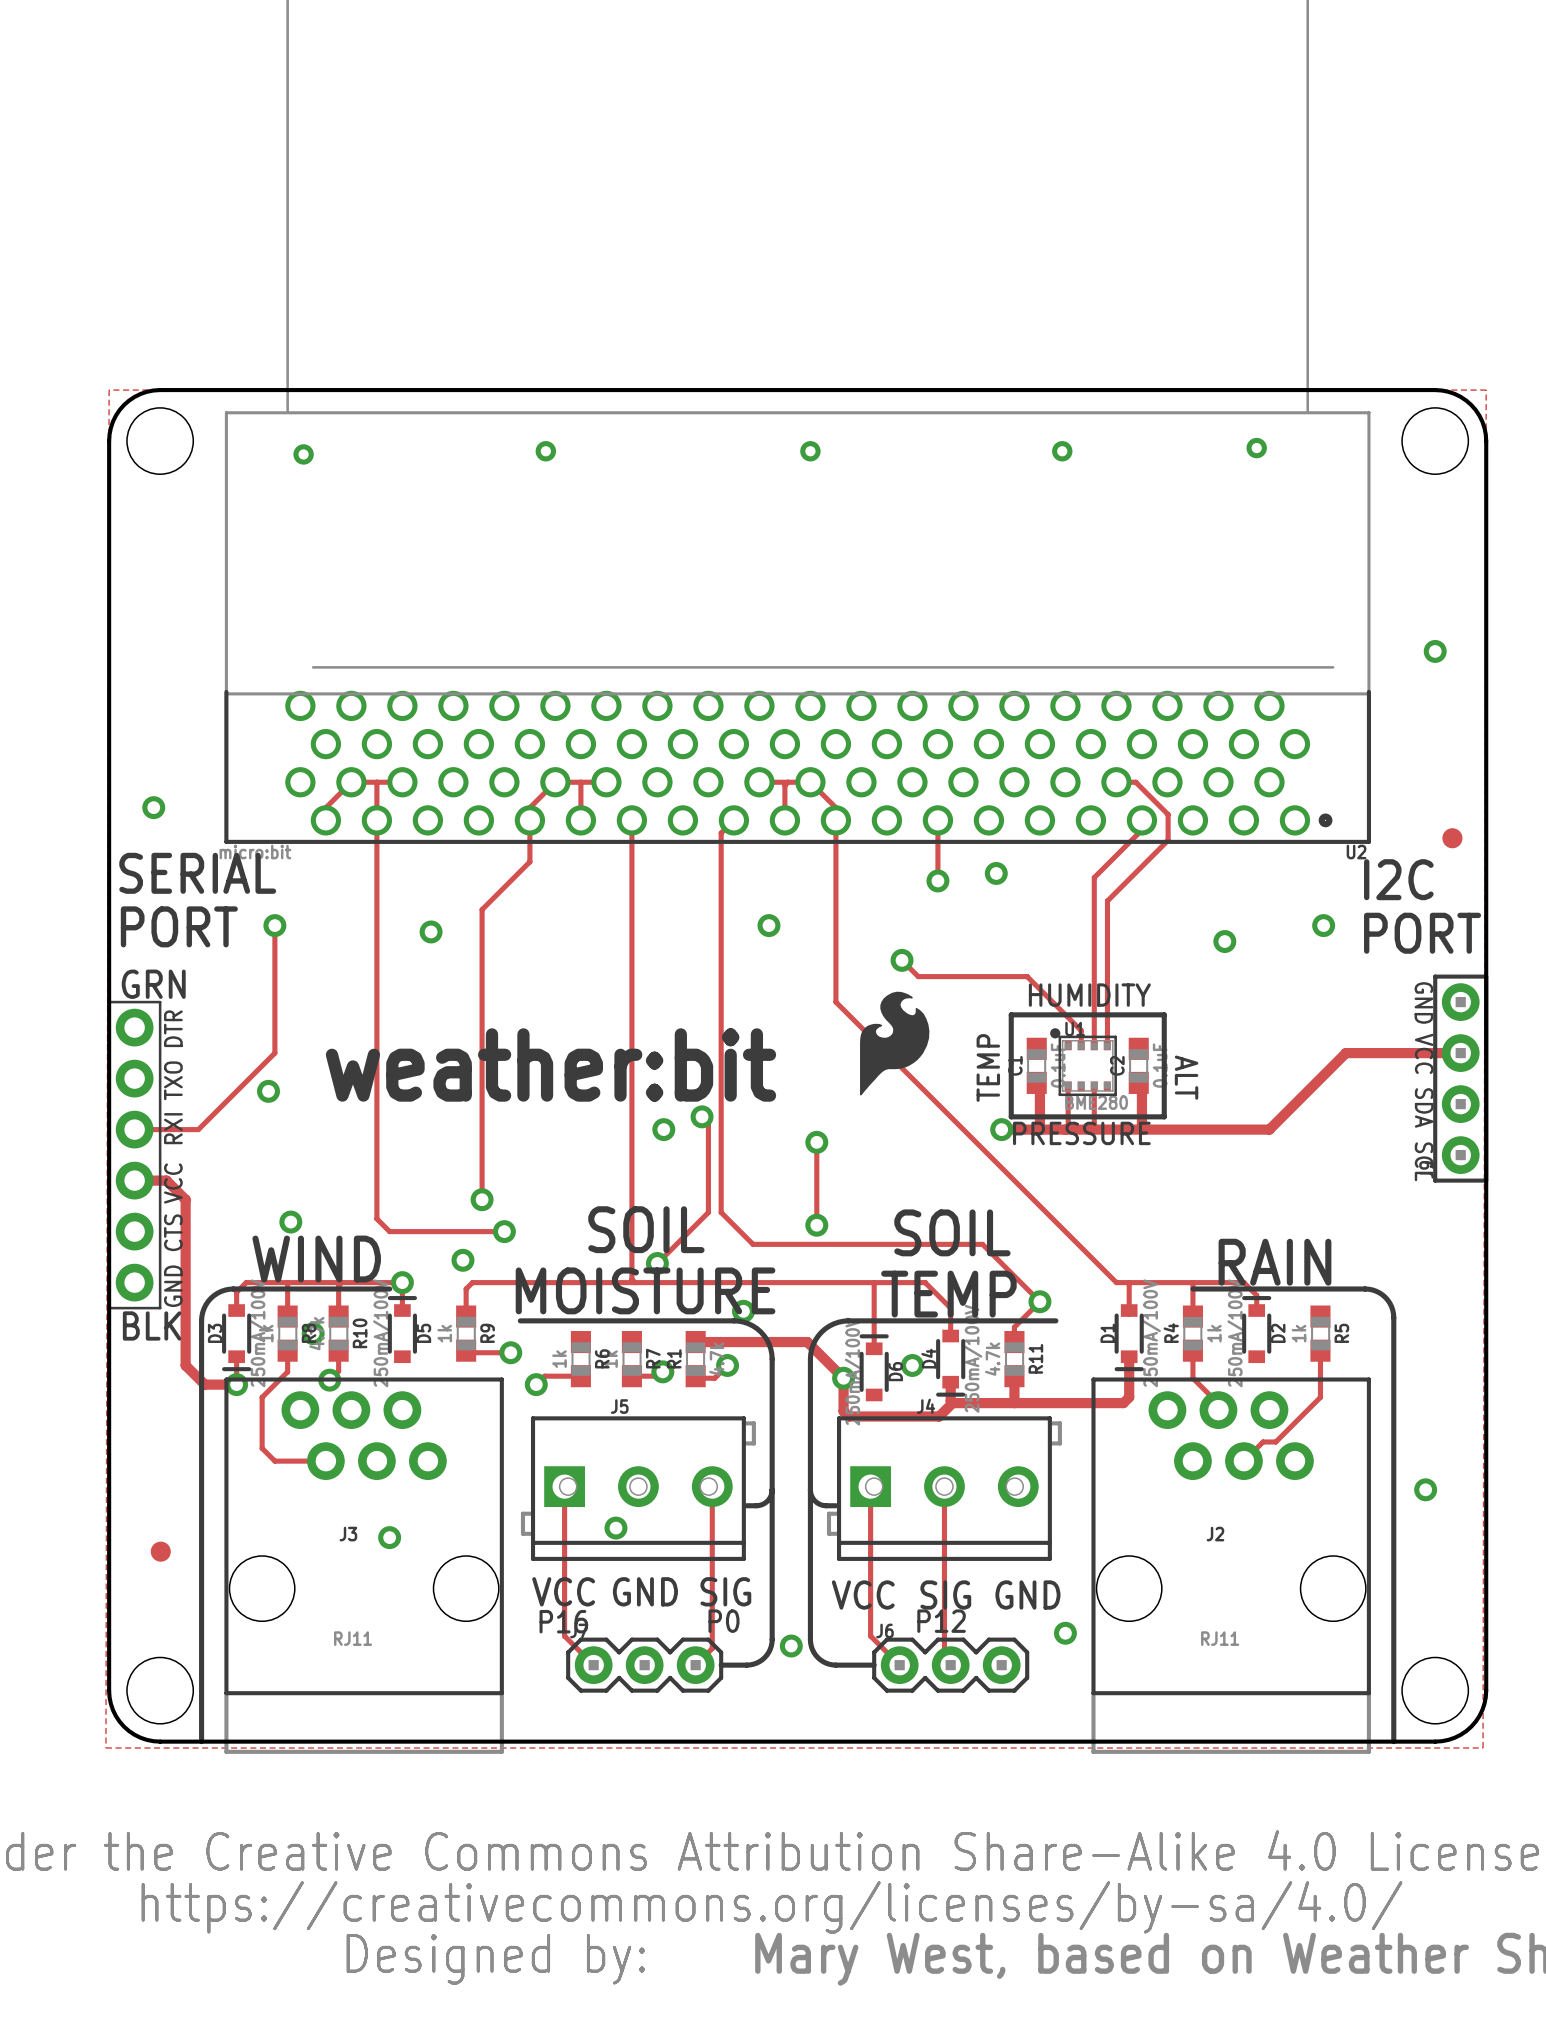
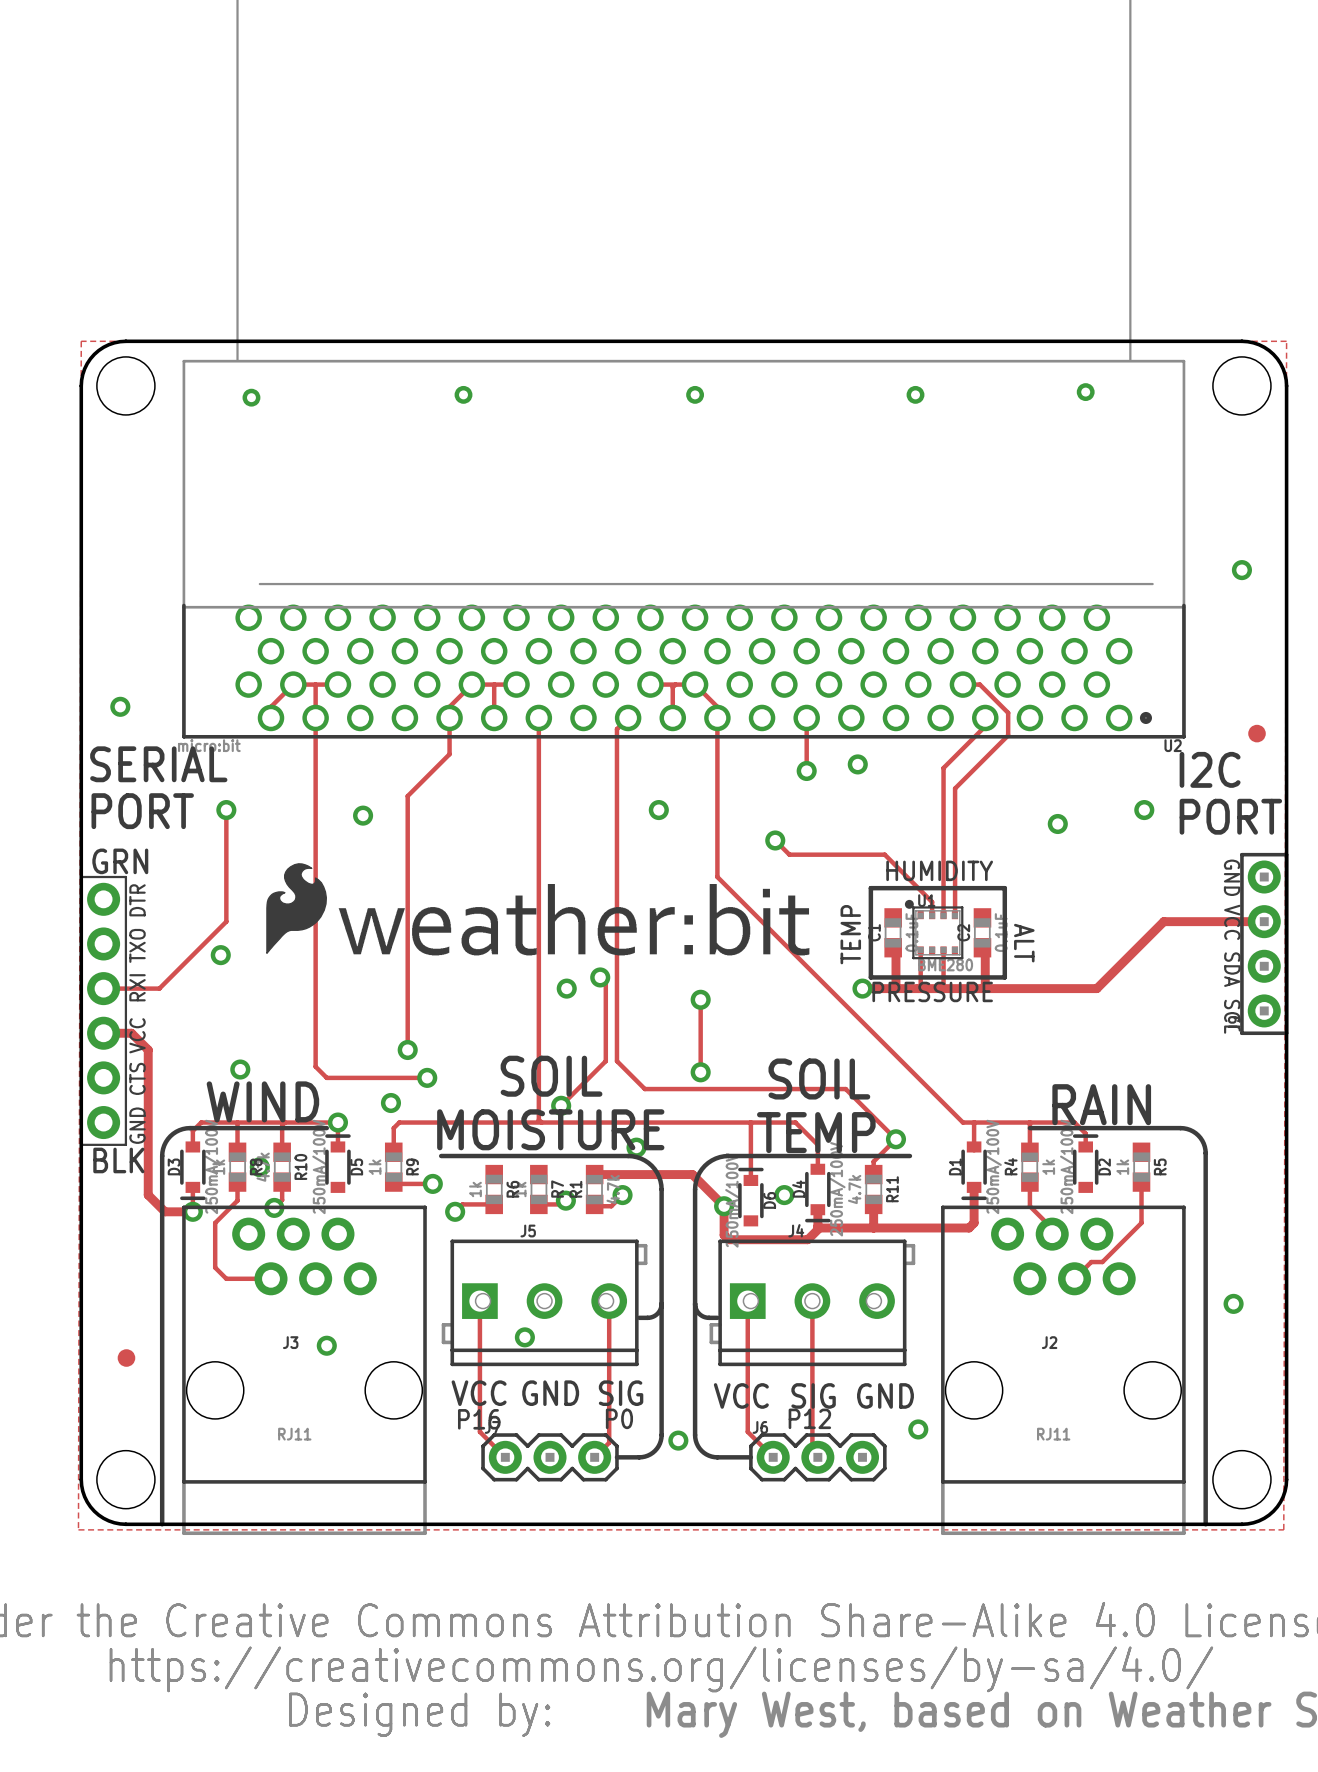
drawing: none -> [266, 863, 810, 956]
drawing: [860, 991, 930, 1096] -> none
text: weather:bit (550, 1064) -> none

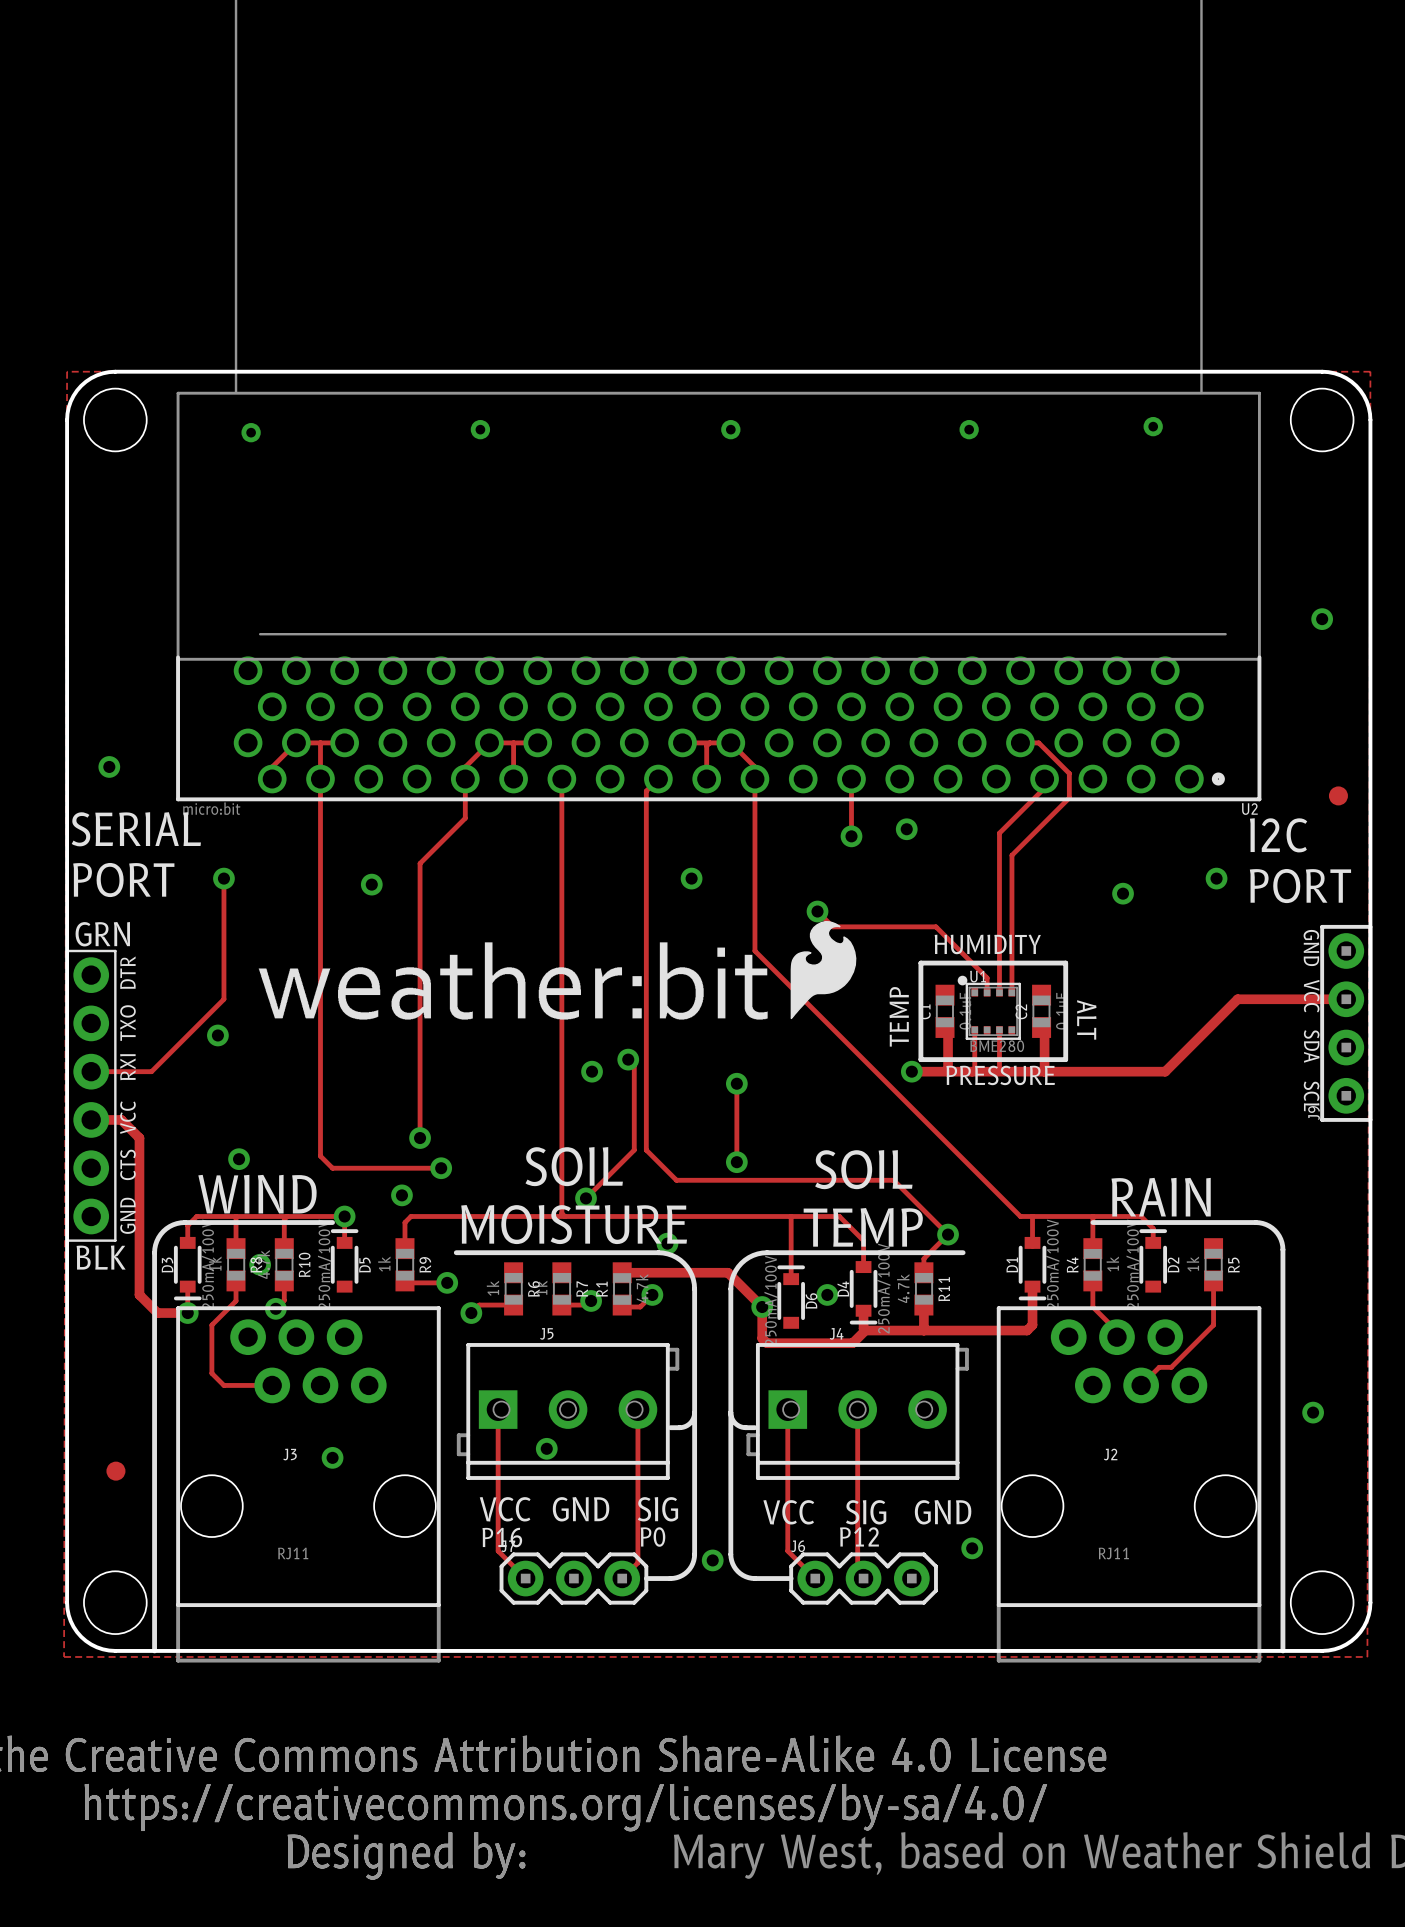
drawing: none -> [790, 920, 857, 1020]
drawing: [266, 863, 327, 954] -> none
drawing position: (574, 919) -> (513, 980)

